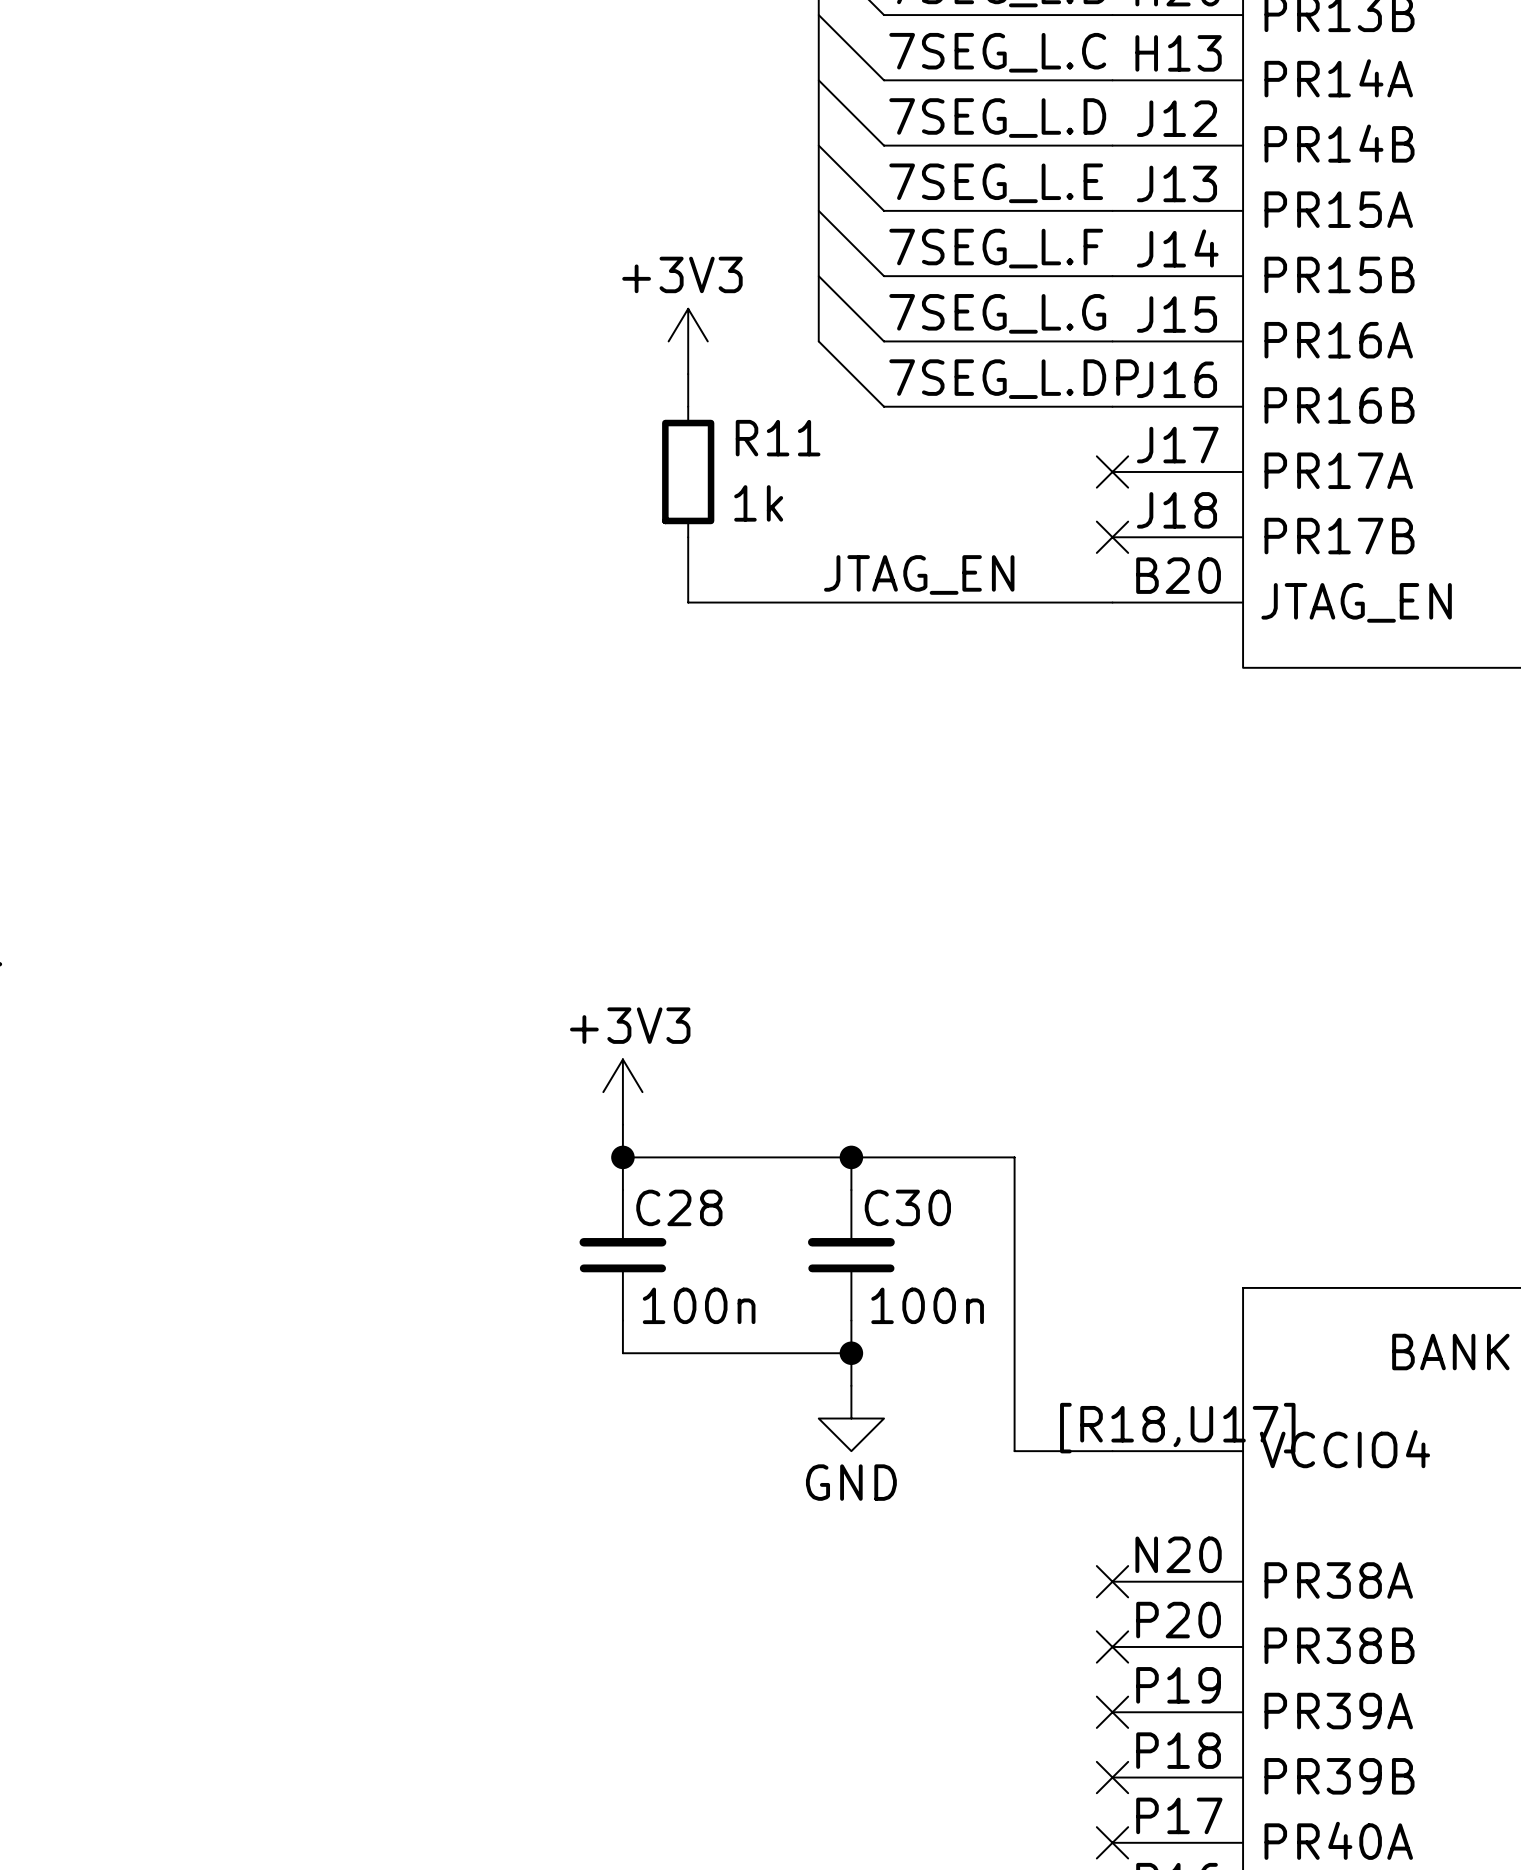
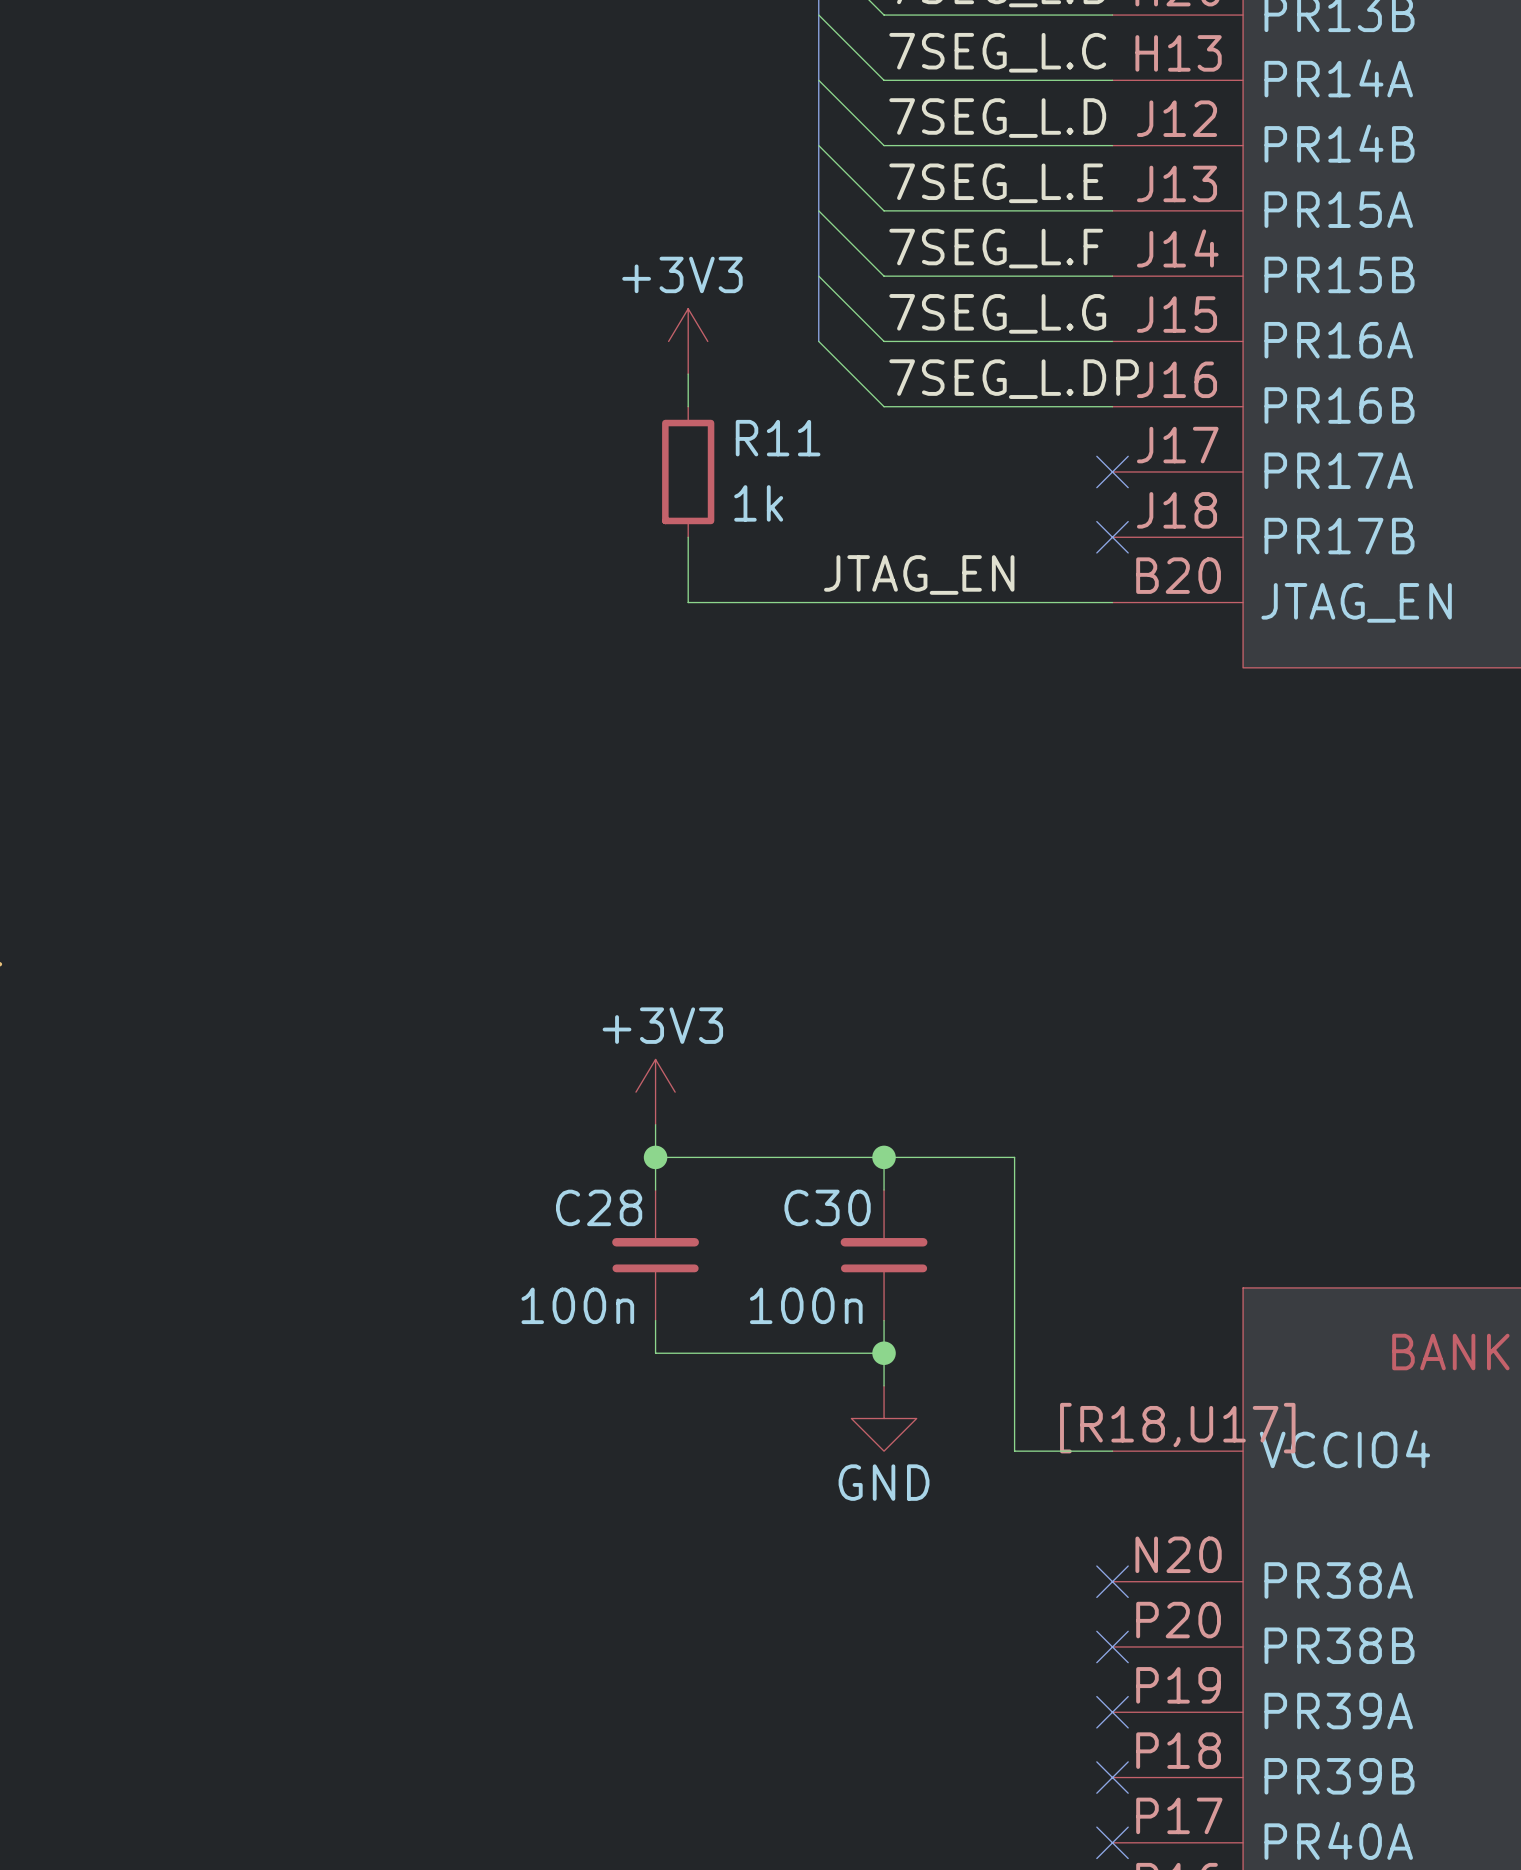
power symbol position: +3V3 (622, 1092) -> +3V3 (655, 1092)
wire: (622, 1124) (622, 1190) -> (655, 1124) (655, 1190)
wire: (622, 1157) (655, 1157) -> (851, 1353) (884, 1353)
junction position: (622, 1157) -> (655, 1157)
wire: (851, 1157) (851, 1190) -> (884, 1157) (884, 1190)
junction position: (851, 1157) -> (884, 1157)
C28 name position: C28 (679, 1207) -> C28 (599, 1207)
C30 name position: C30 (907, 1207) -> C30 (827, 1207)
C28 position: (622, 1255) -> (655, 1255)
C30 position: (851, 1255) -> (884, 1255)
C28 text position: 100n (699, 1305) -> 100n (577, 1305)
C30 text position: 100n (927, 1305) -> 100n (806, 1305)
wire: (622, 1320) (622, 1353) (655, 1353) -> (655, 1320) (655, 1353)
wire: (851, 1320) (851, 1385) -> (884, 1320) (884, 1385)
junction position: (851, 1353) -> (884, 1353)
power symbol position: GND (851, 1418) -> GND (884, 1418)

